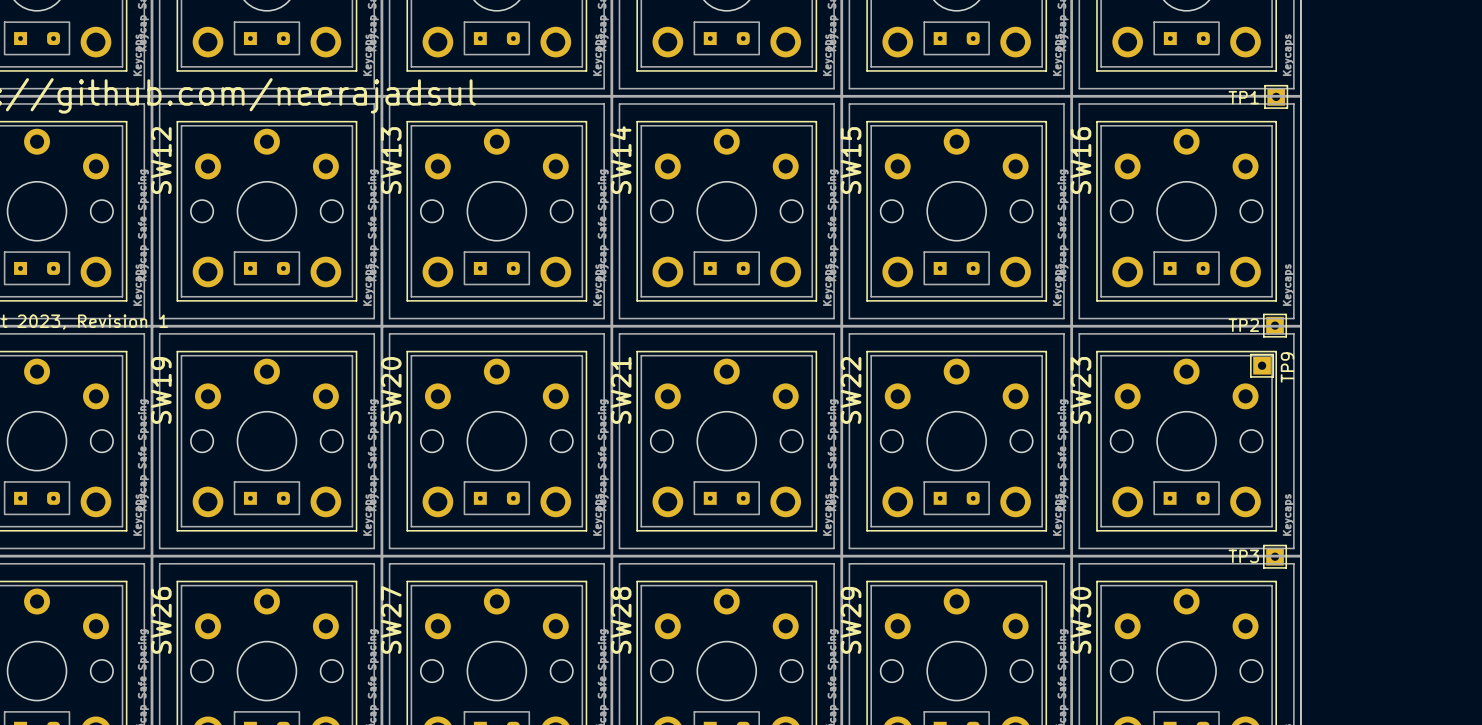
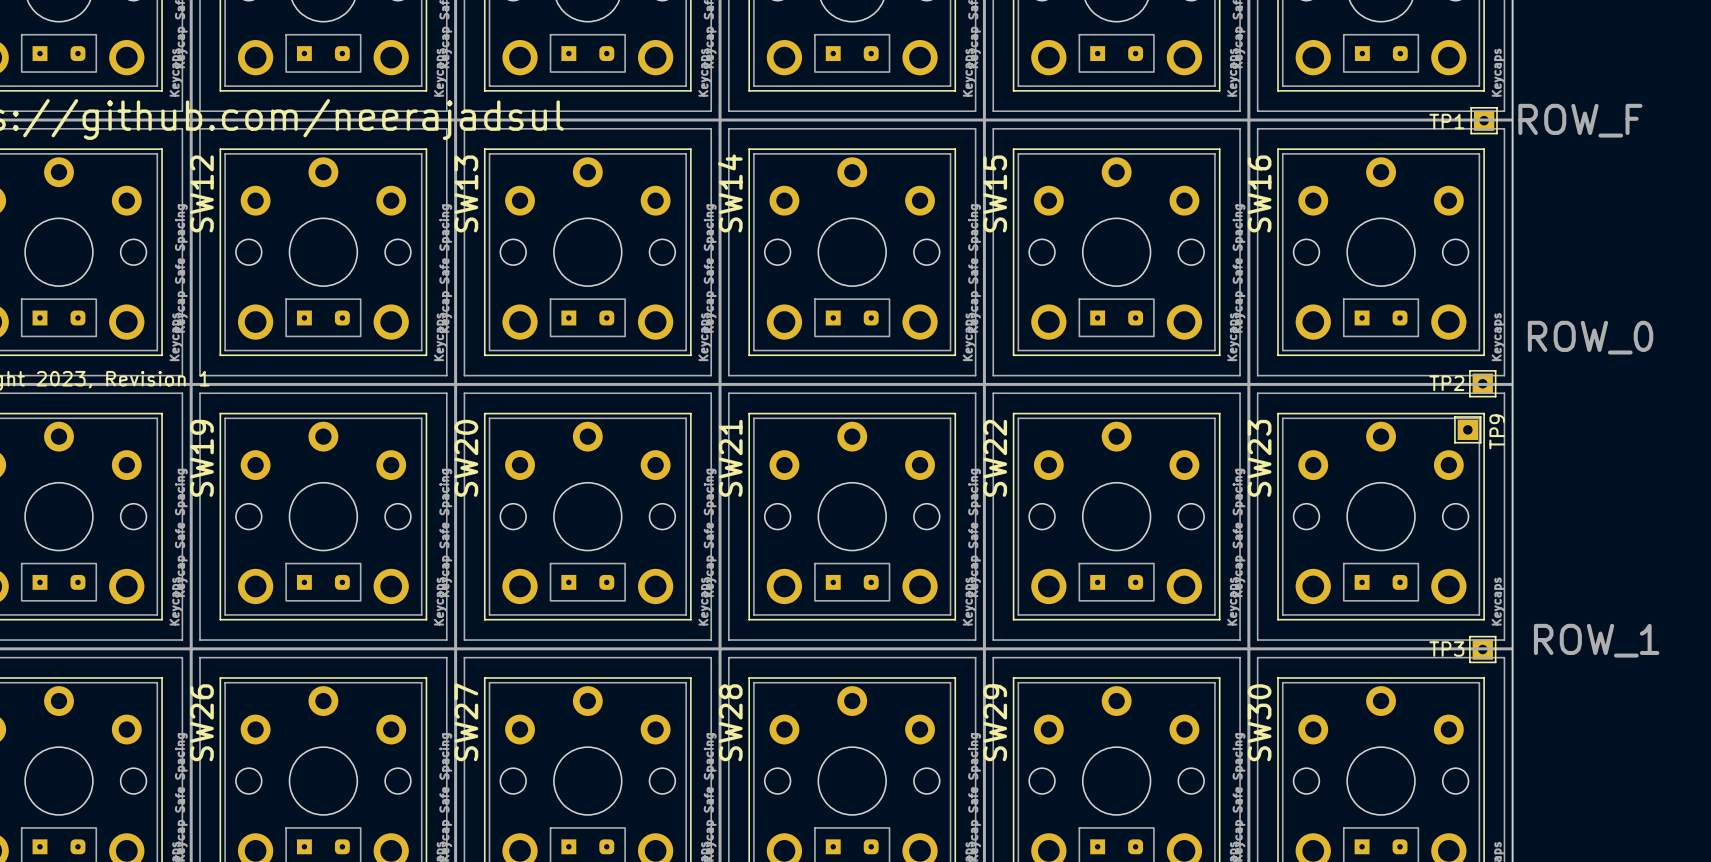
text: none -> ROW_F (1580, 120)
text: none -> ROW_0 (1590, 337)
text: none -> ROW_1 (1596, 640)

